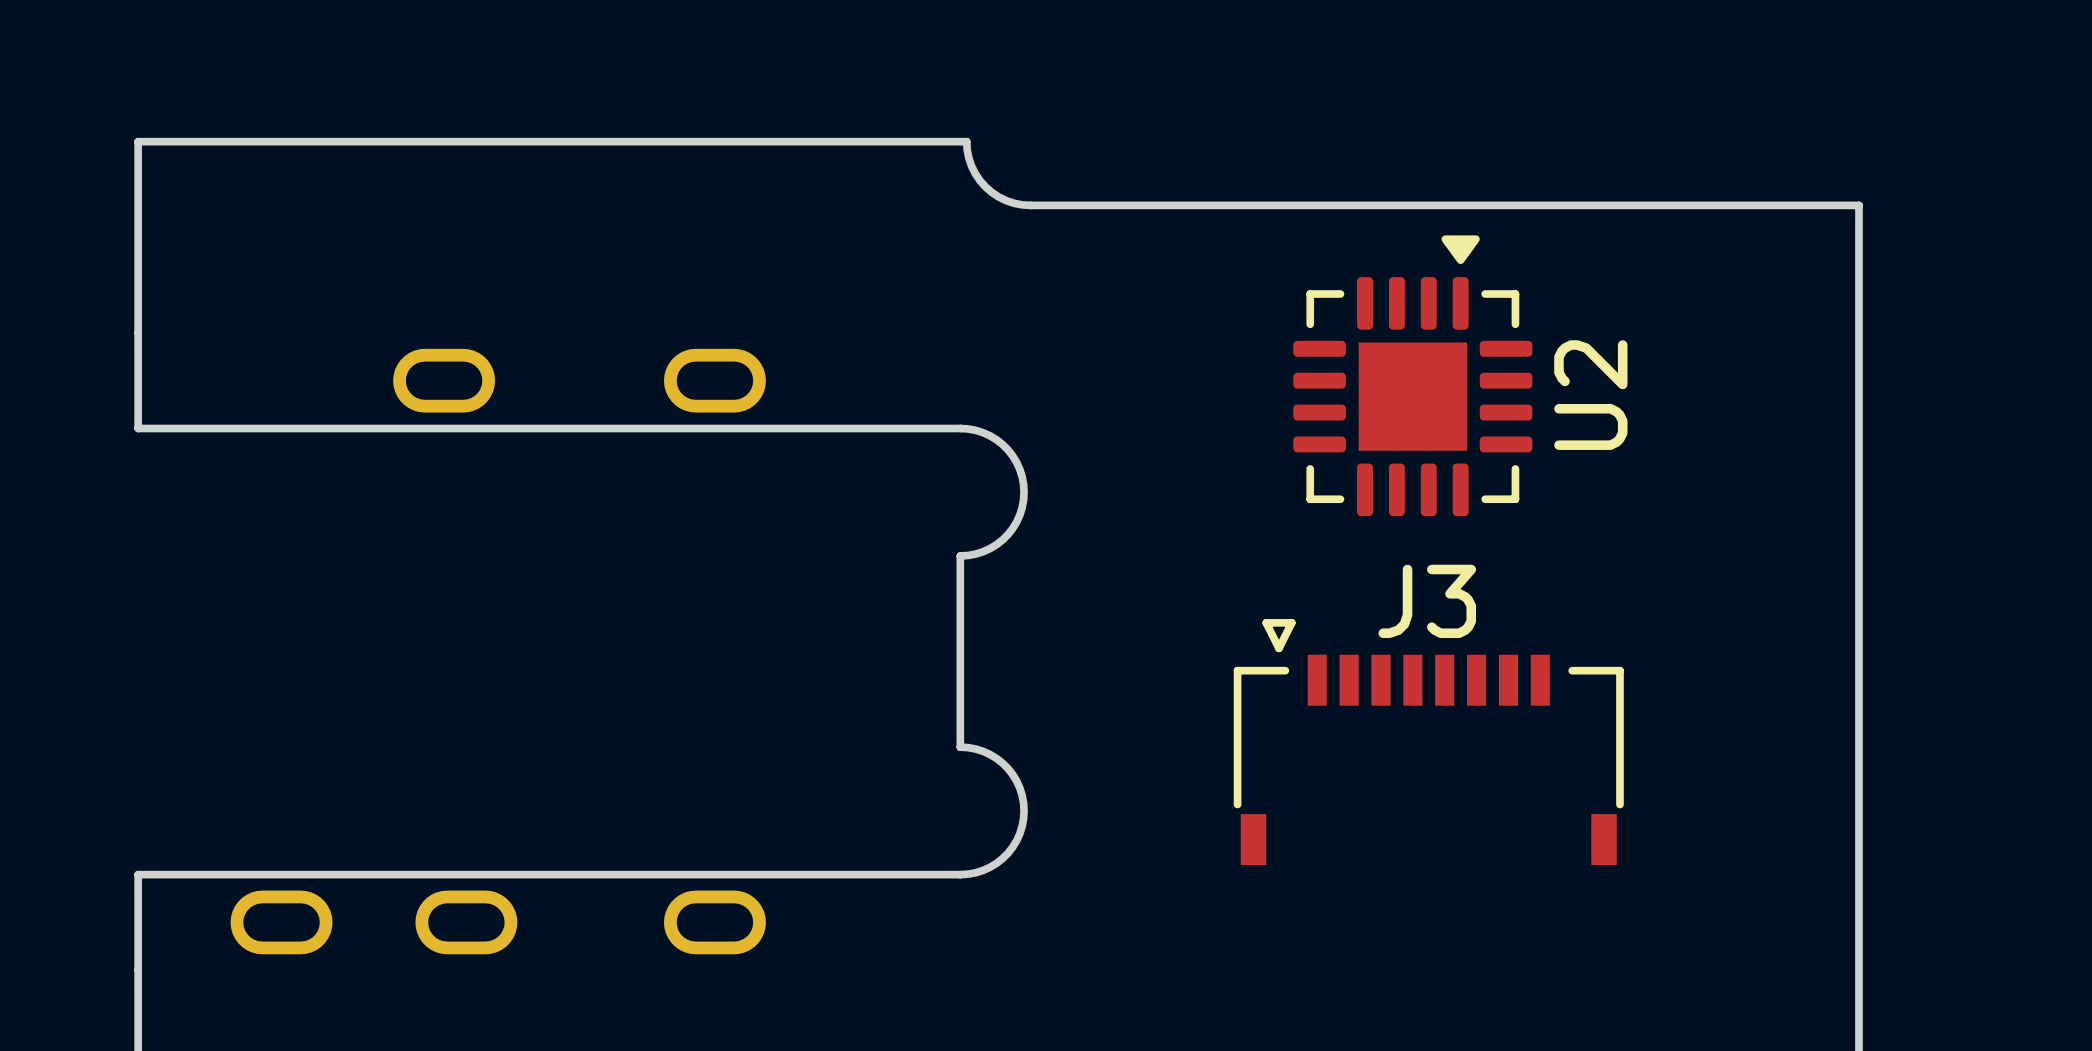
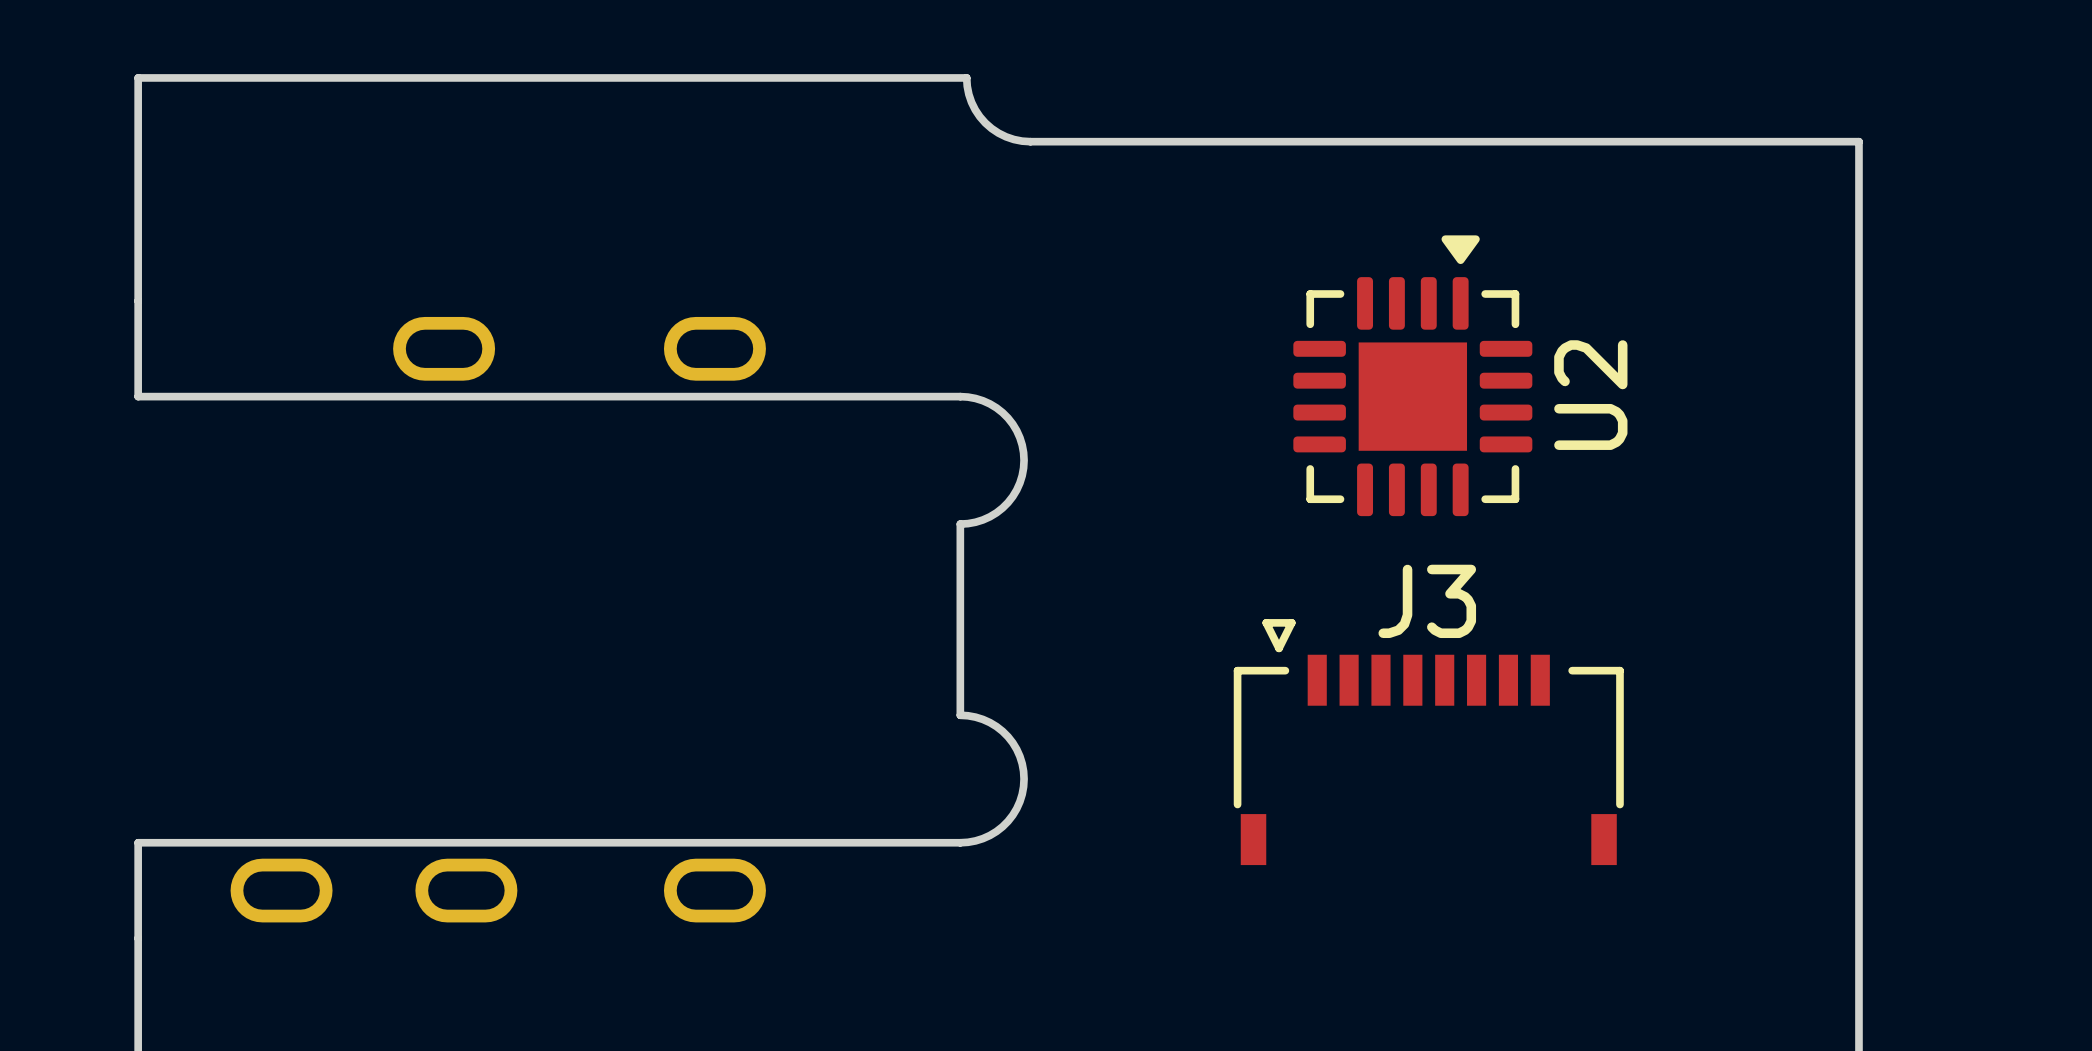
board edge: (138, 141) (966, 141) (971, 166) (985, 186) (1006, 200) (1030, 205) (1858, 205) -> (138, 141) (138, 77) (966, 77) (971, 102) (985, 123) (1006, 136) (1022, 141) (1858, 141) (1858, 205)
board edge: (138, 301) (138, 332) -> (138, 938) (138, 970)
part position: (581, 651) -> (581, 619)

